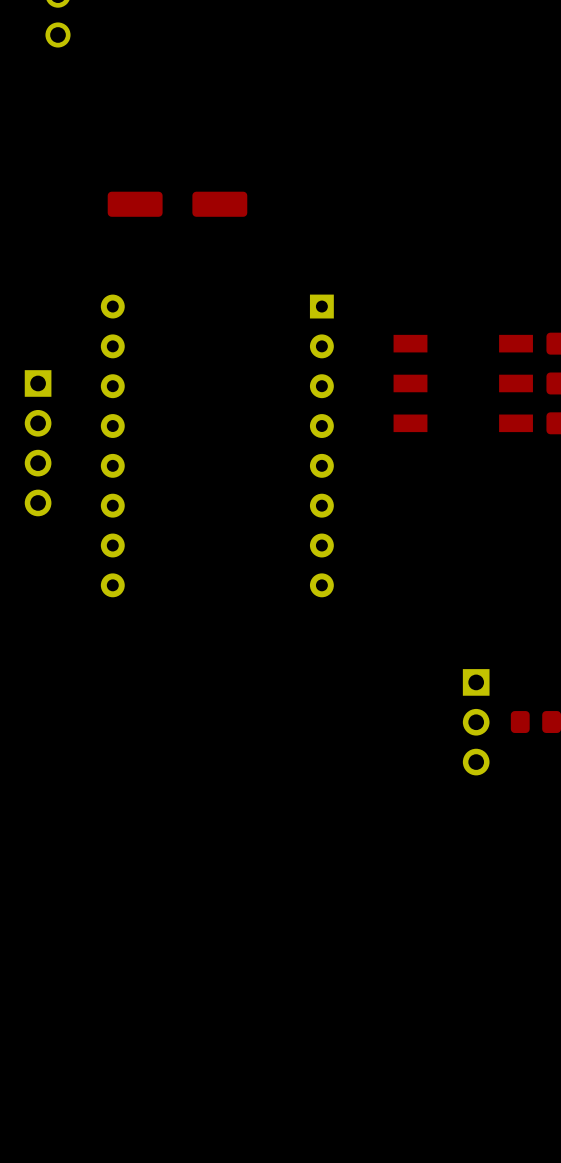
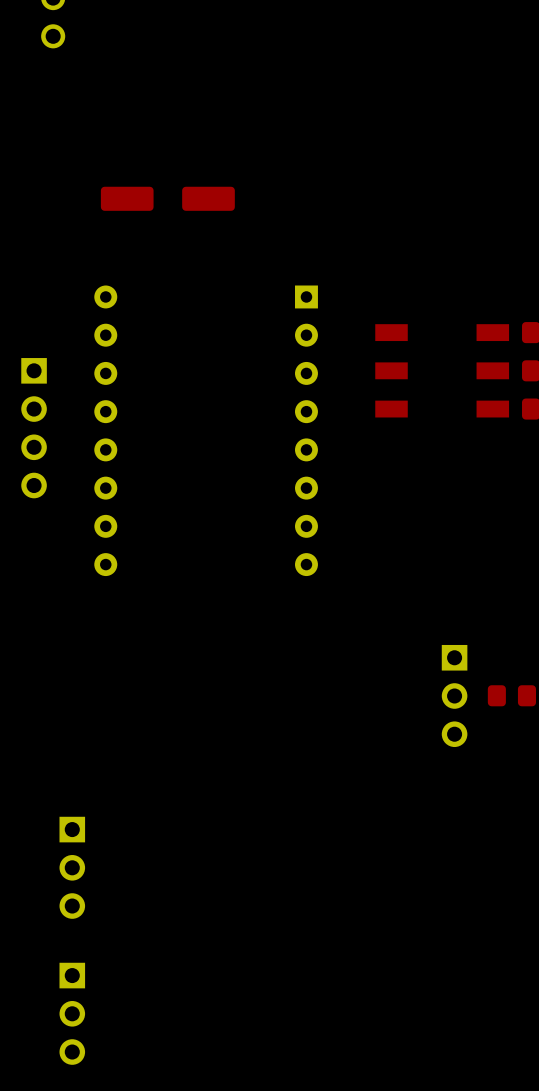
part: none -> (72, 867)
part: none -> (72, 1013)

